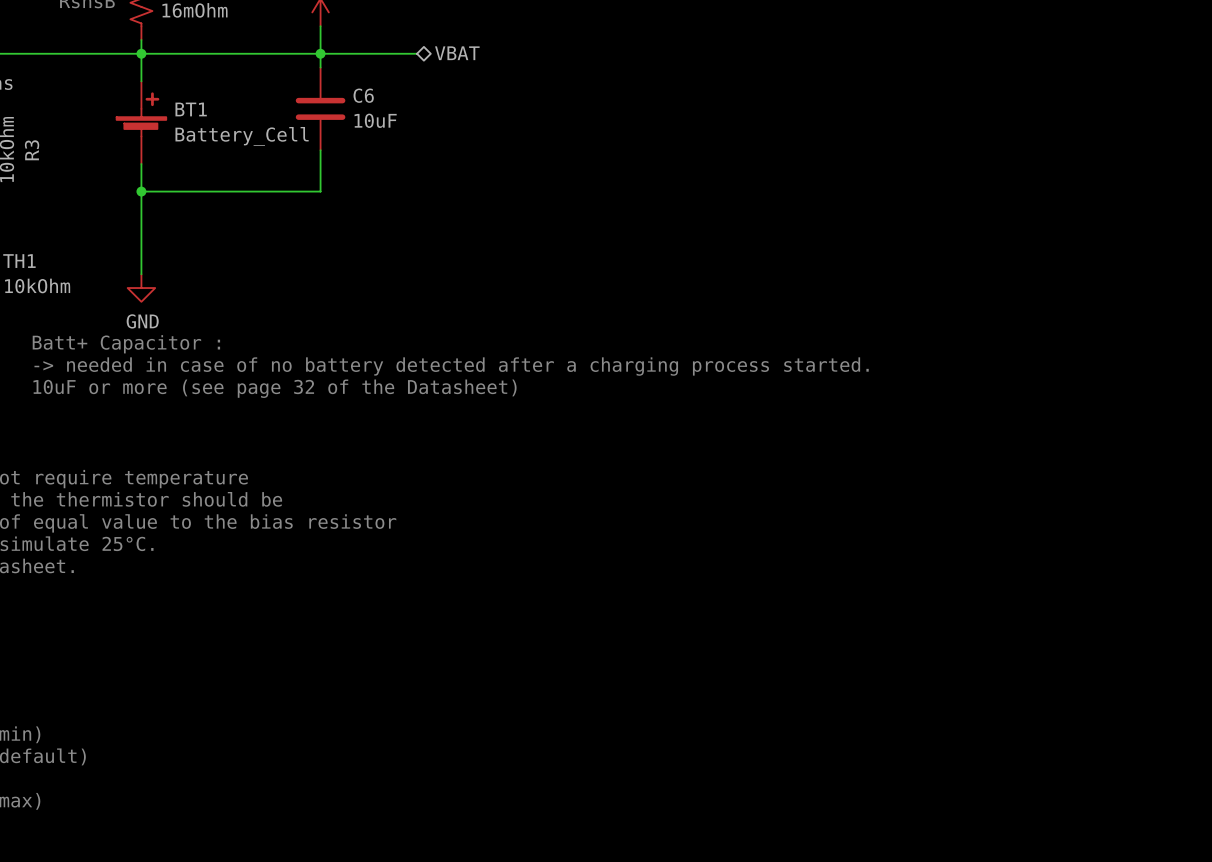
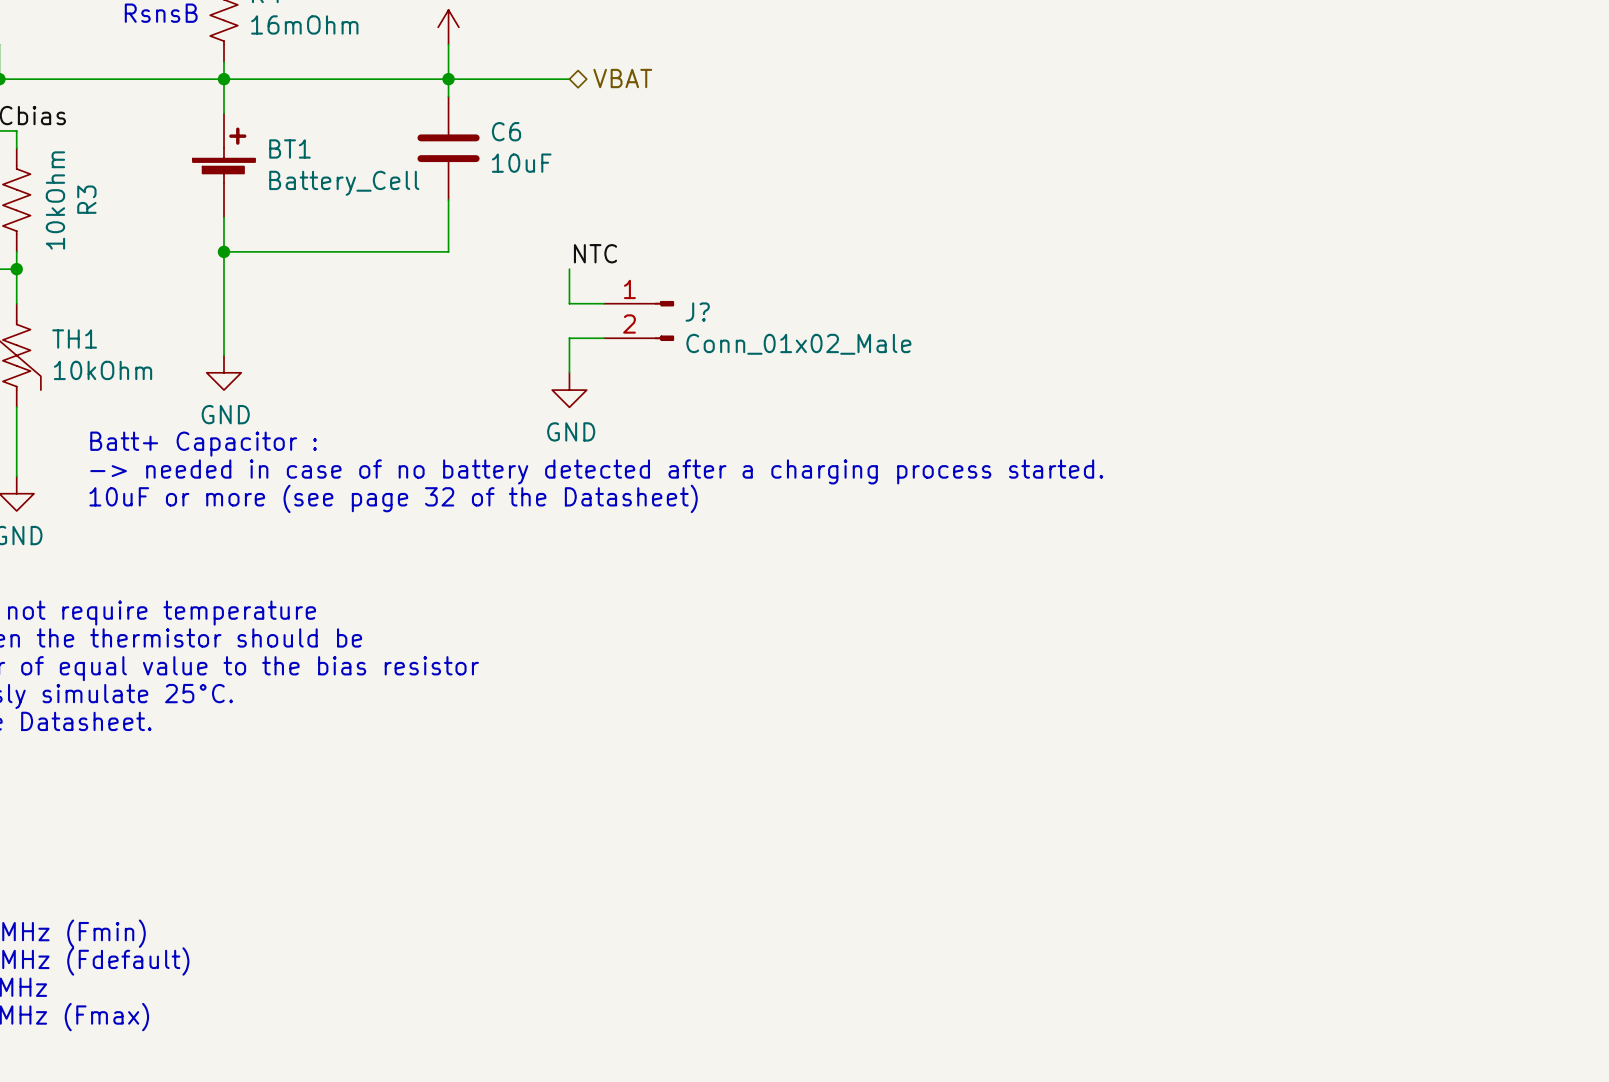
label: none -> NTC (595, 253)
wire: none -> (569, 269) (569, 303) (604, 303)
J?: none -> Conn_01x02_Male (639, 320)
wire: none -> (604, 338) (569, 338) (569, 372)
power symbol: none -> GND (569, 390)

